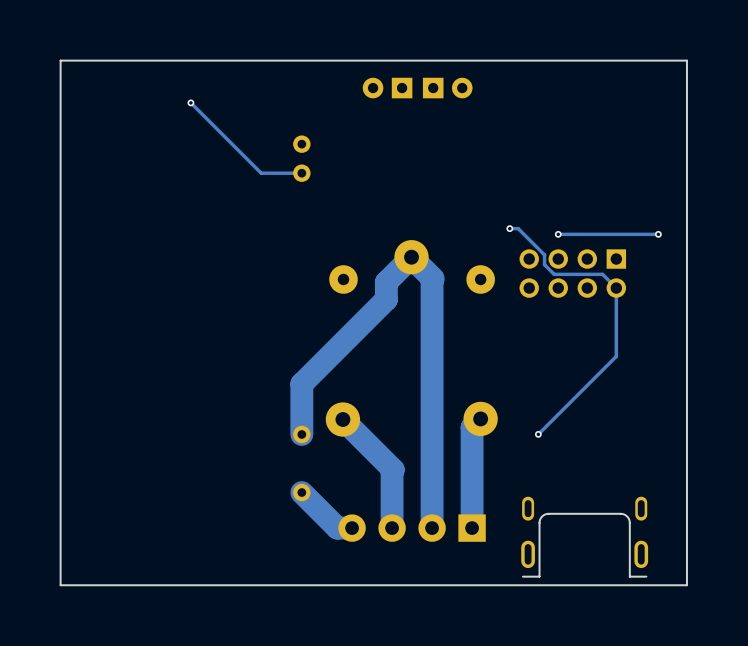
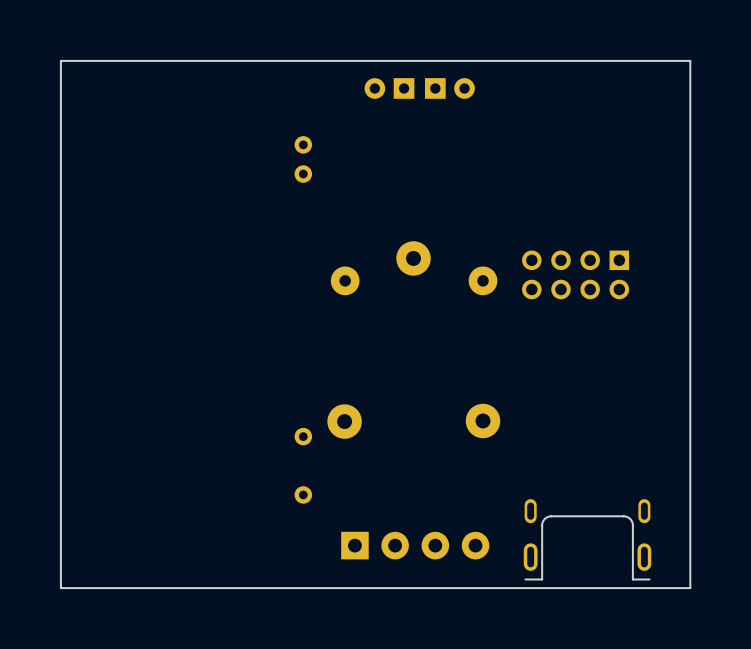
track: (190, 102) (261, 173) (301, 173) -> none
via: (190, 102) -> none
track: (509, 228) (518, 228) (544, 254) (544, 264) (554, 274) (602, 274) (616, 288) (616, 356) (538, 434) -> none
via: (509, 228) -> none
via: (558, 234) -> none
track: (658, 234) (558, 234) -> none
via: (658, 234) -> none
track: (432, 277) (432, 528) -> none
track: (433, 278) (411, 257) (386, 282) (386, 299) (301, 384) (301, 434) -> none
track: (480, 418) (472, 427) (472, 528) -> none
track: (342, 419) (393, 469) (392, 528) -> none
via: (538, 434) -> none
track: (301, 492) (337, 528) (352, 528) -> none
part rotation: 0° (412, 528) -> 180° (415, 545)

